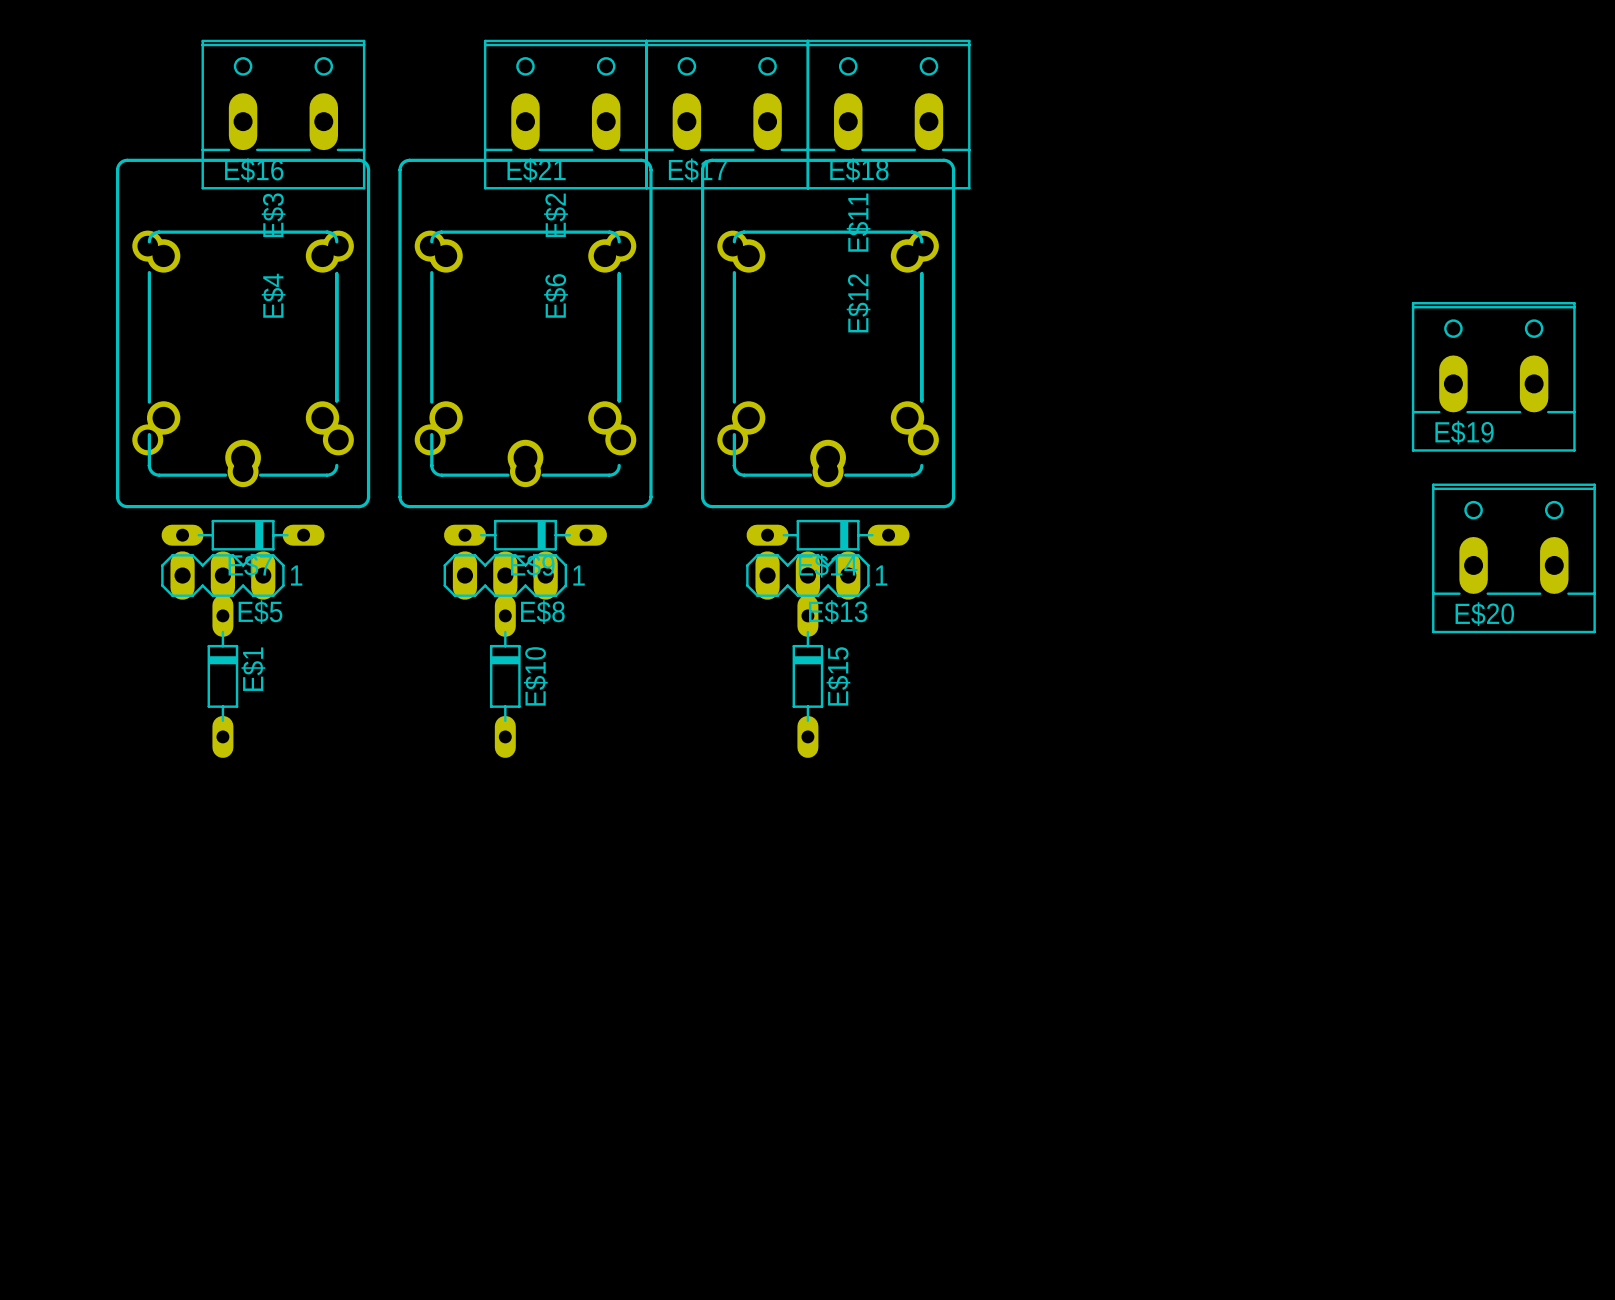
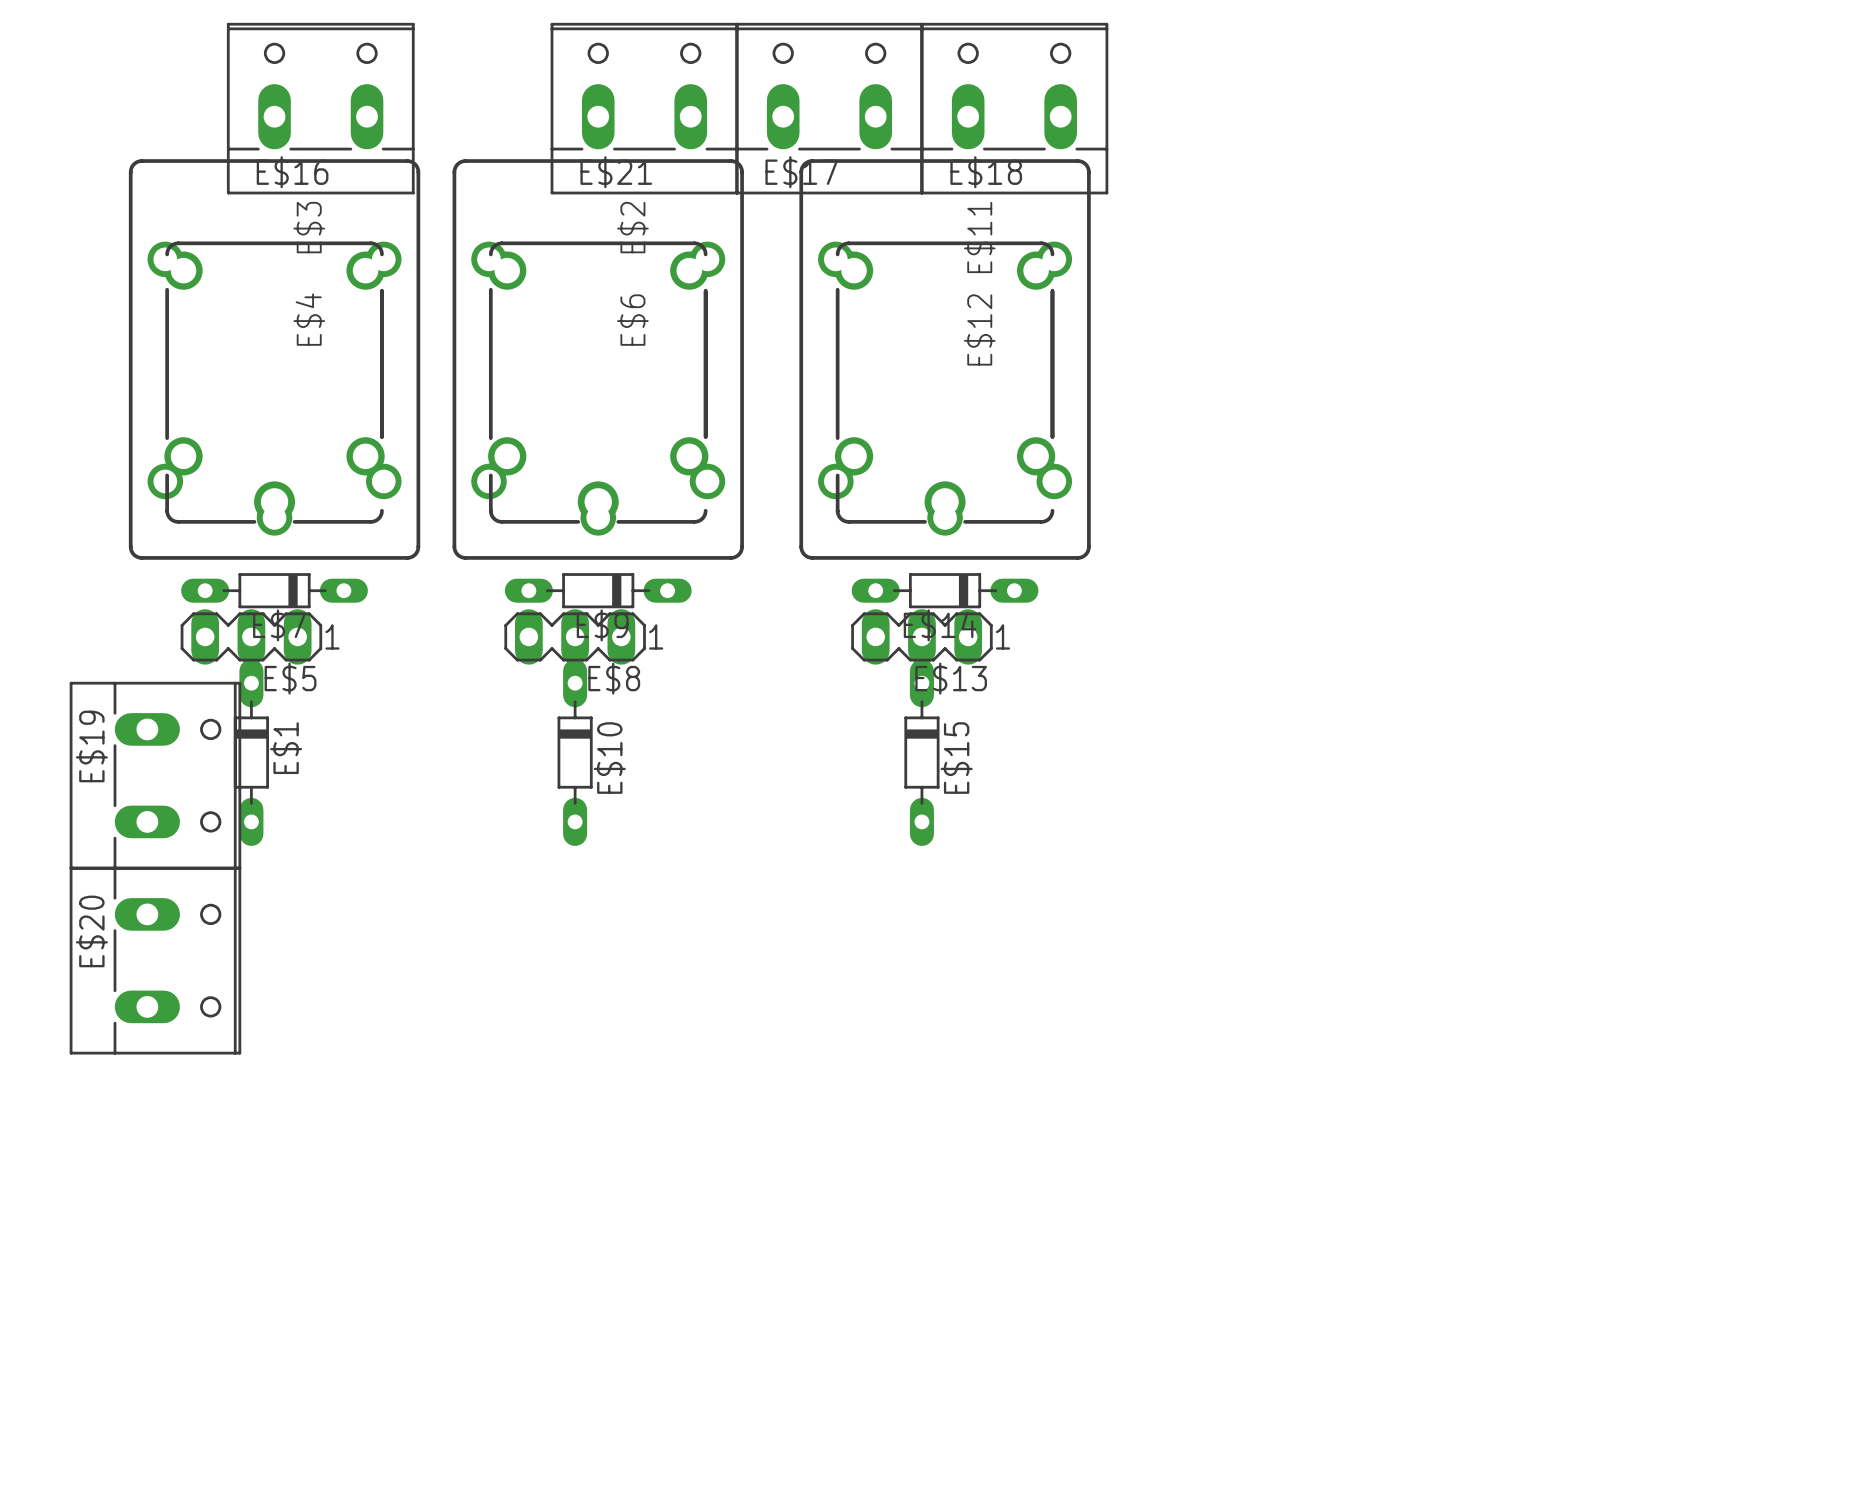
E$19 rotation: 0° (1493, 376) -> 90° clockwise (155, 775)
E$19 position: (1493, 376) -> (155, 775)
E$20 rotation: 0° (1513, 558) -> 90° clockwise (155, 960)
E$20 position: (1513, 558) -> (155, 960)

